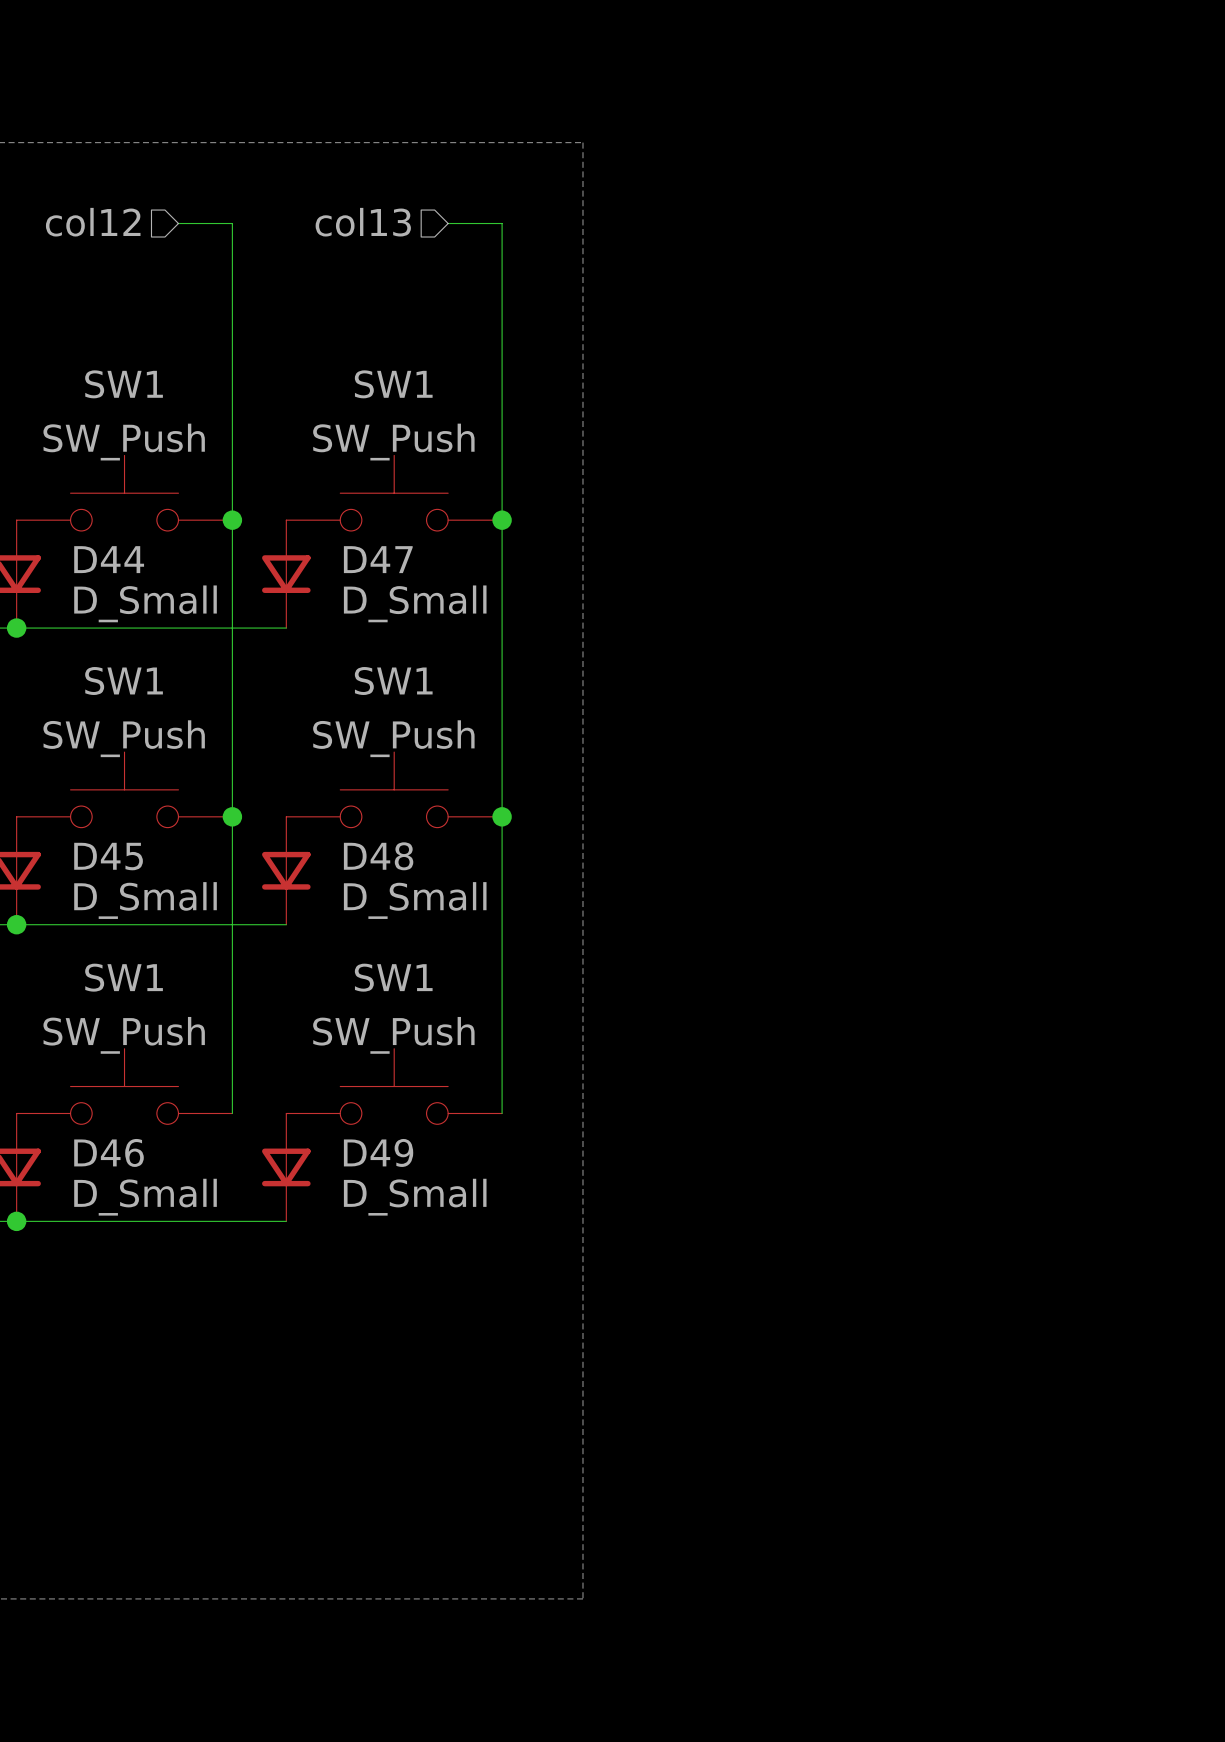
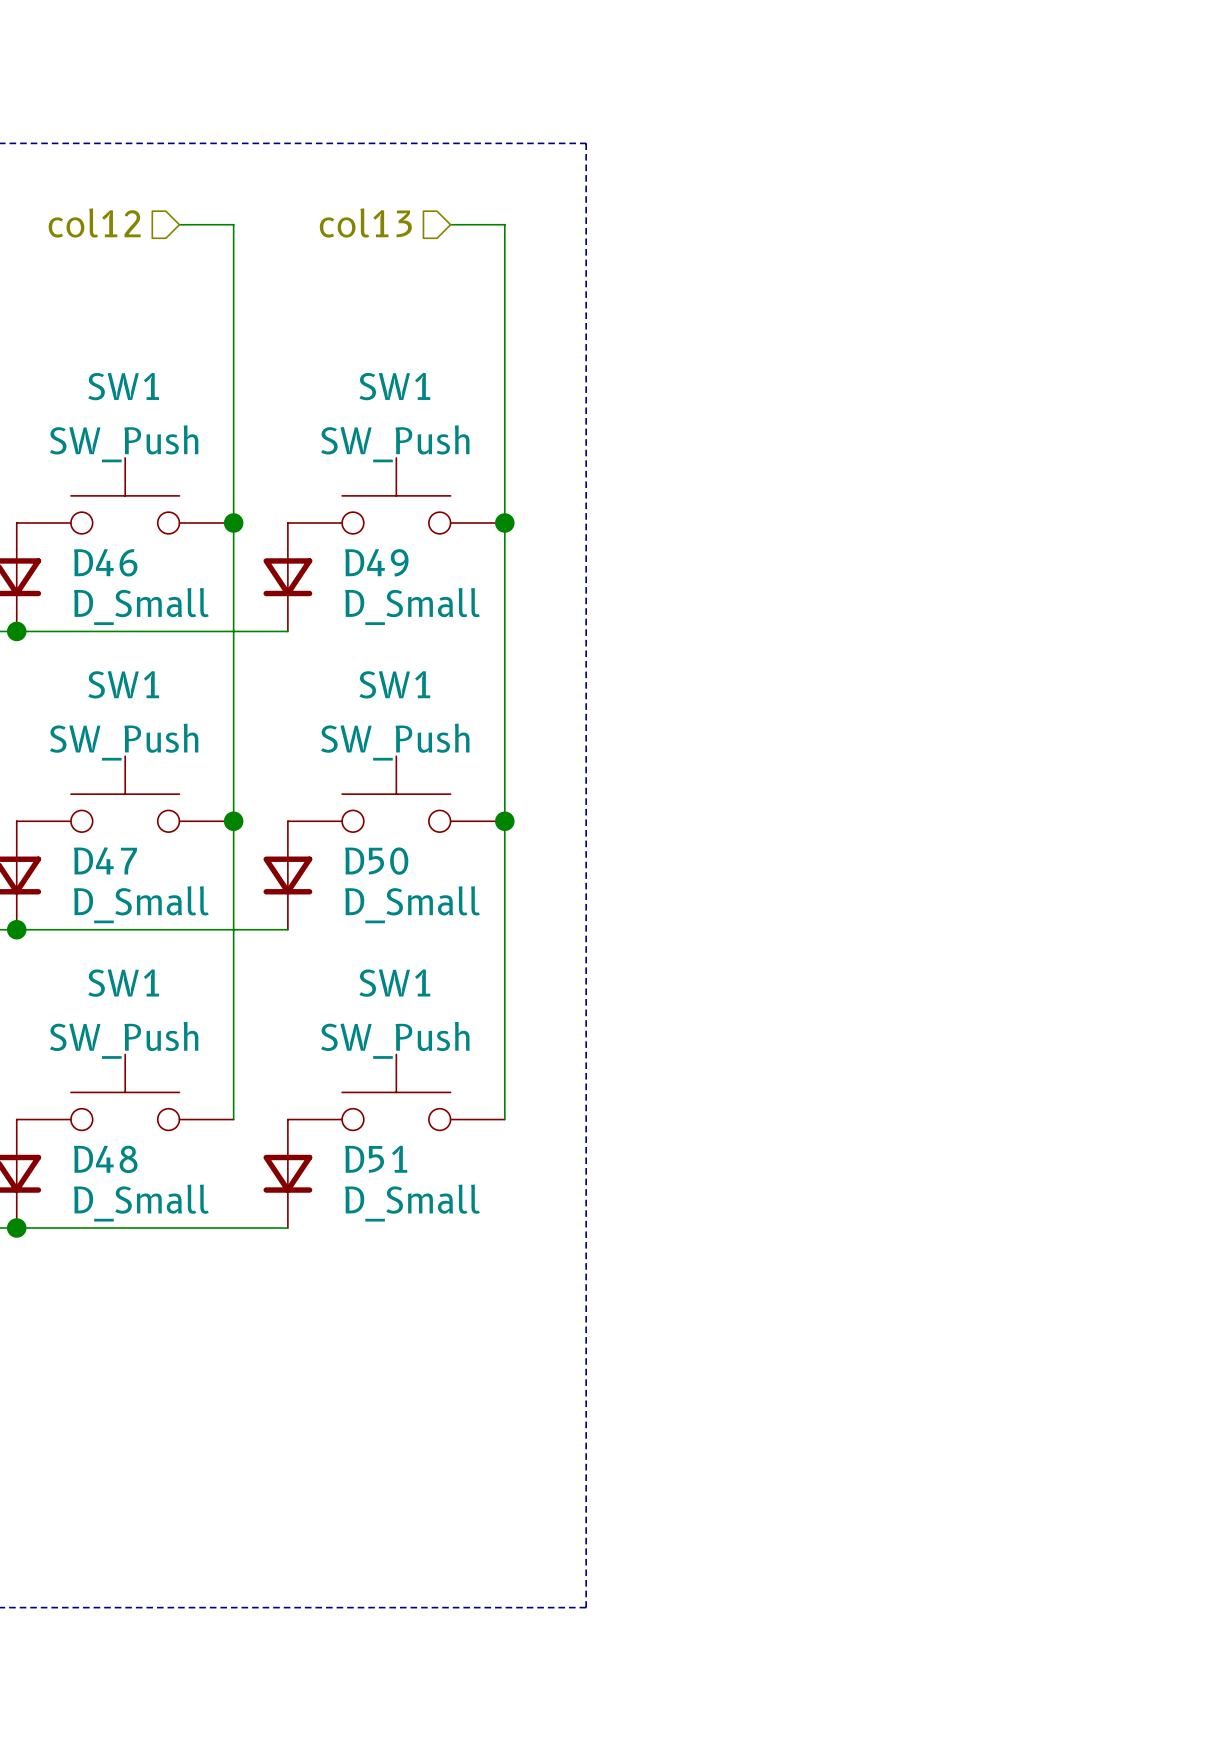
D44 name: D44 (109, 559) -> D46 (105, 562)
D47 name: D47 (378, 559) -> D49 (376, 562)
D45 name: D45 (108, 856) -> D47 (105, 860)
D48 name: D48 (378, 856) -> D50 (376, 861)
D46 name: D46 (109, 1152) -> D48 (105, 1159)
D49 name: D49 (378, 1152) -> D51 (376, 1159)

